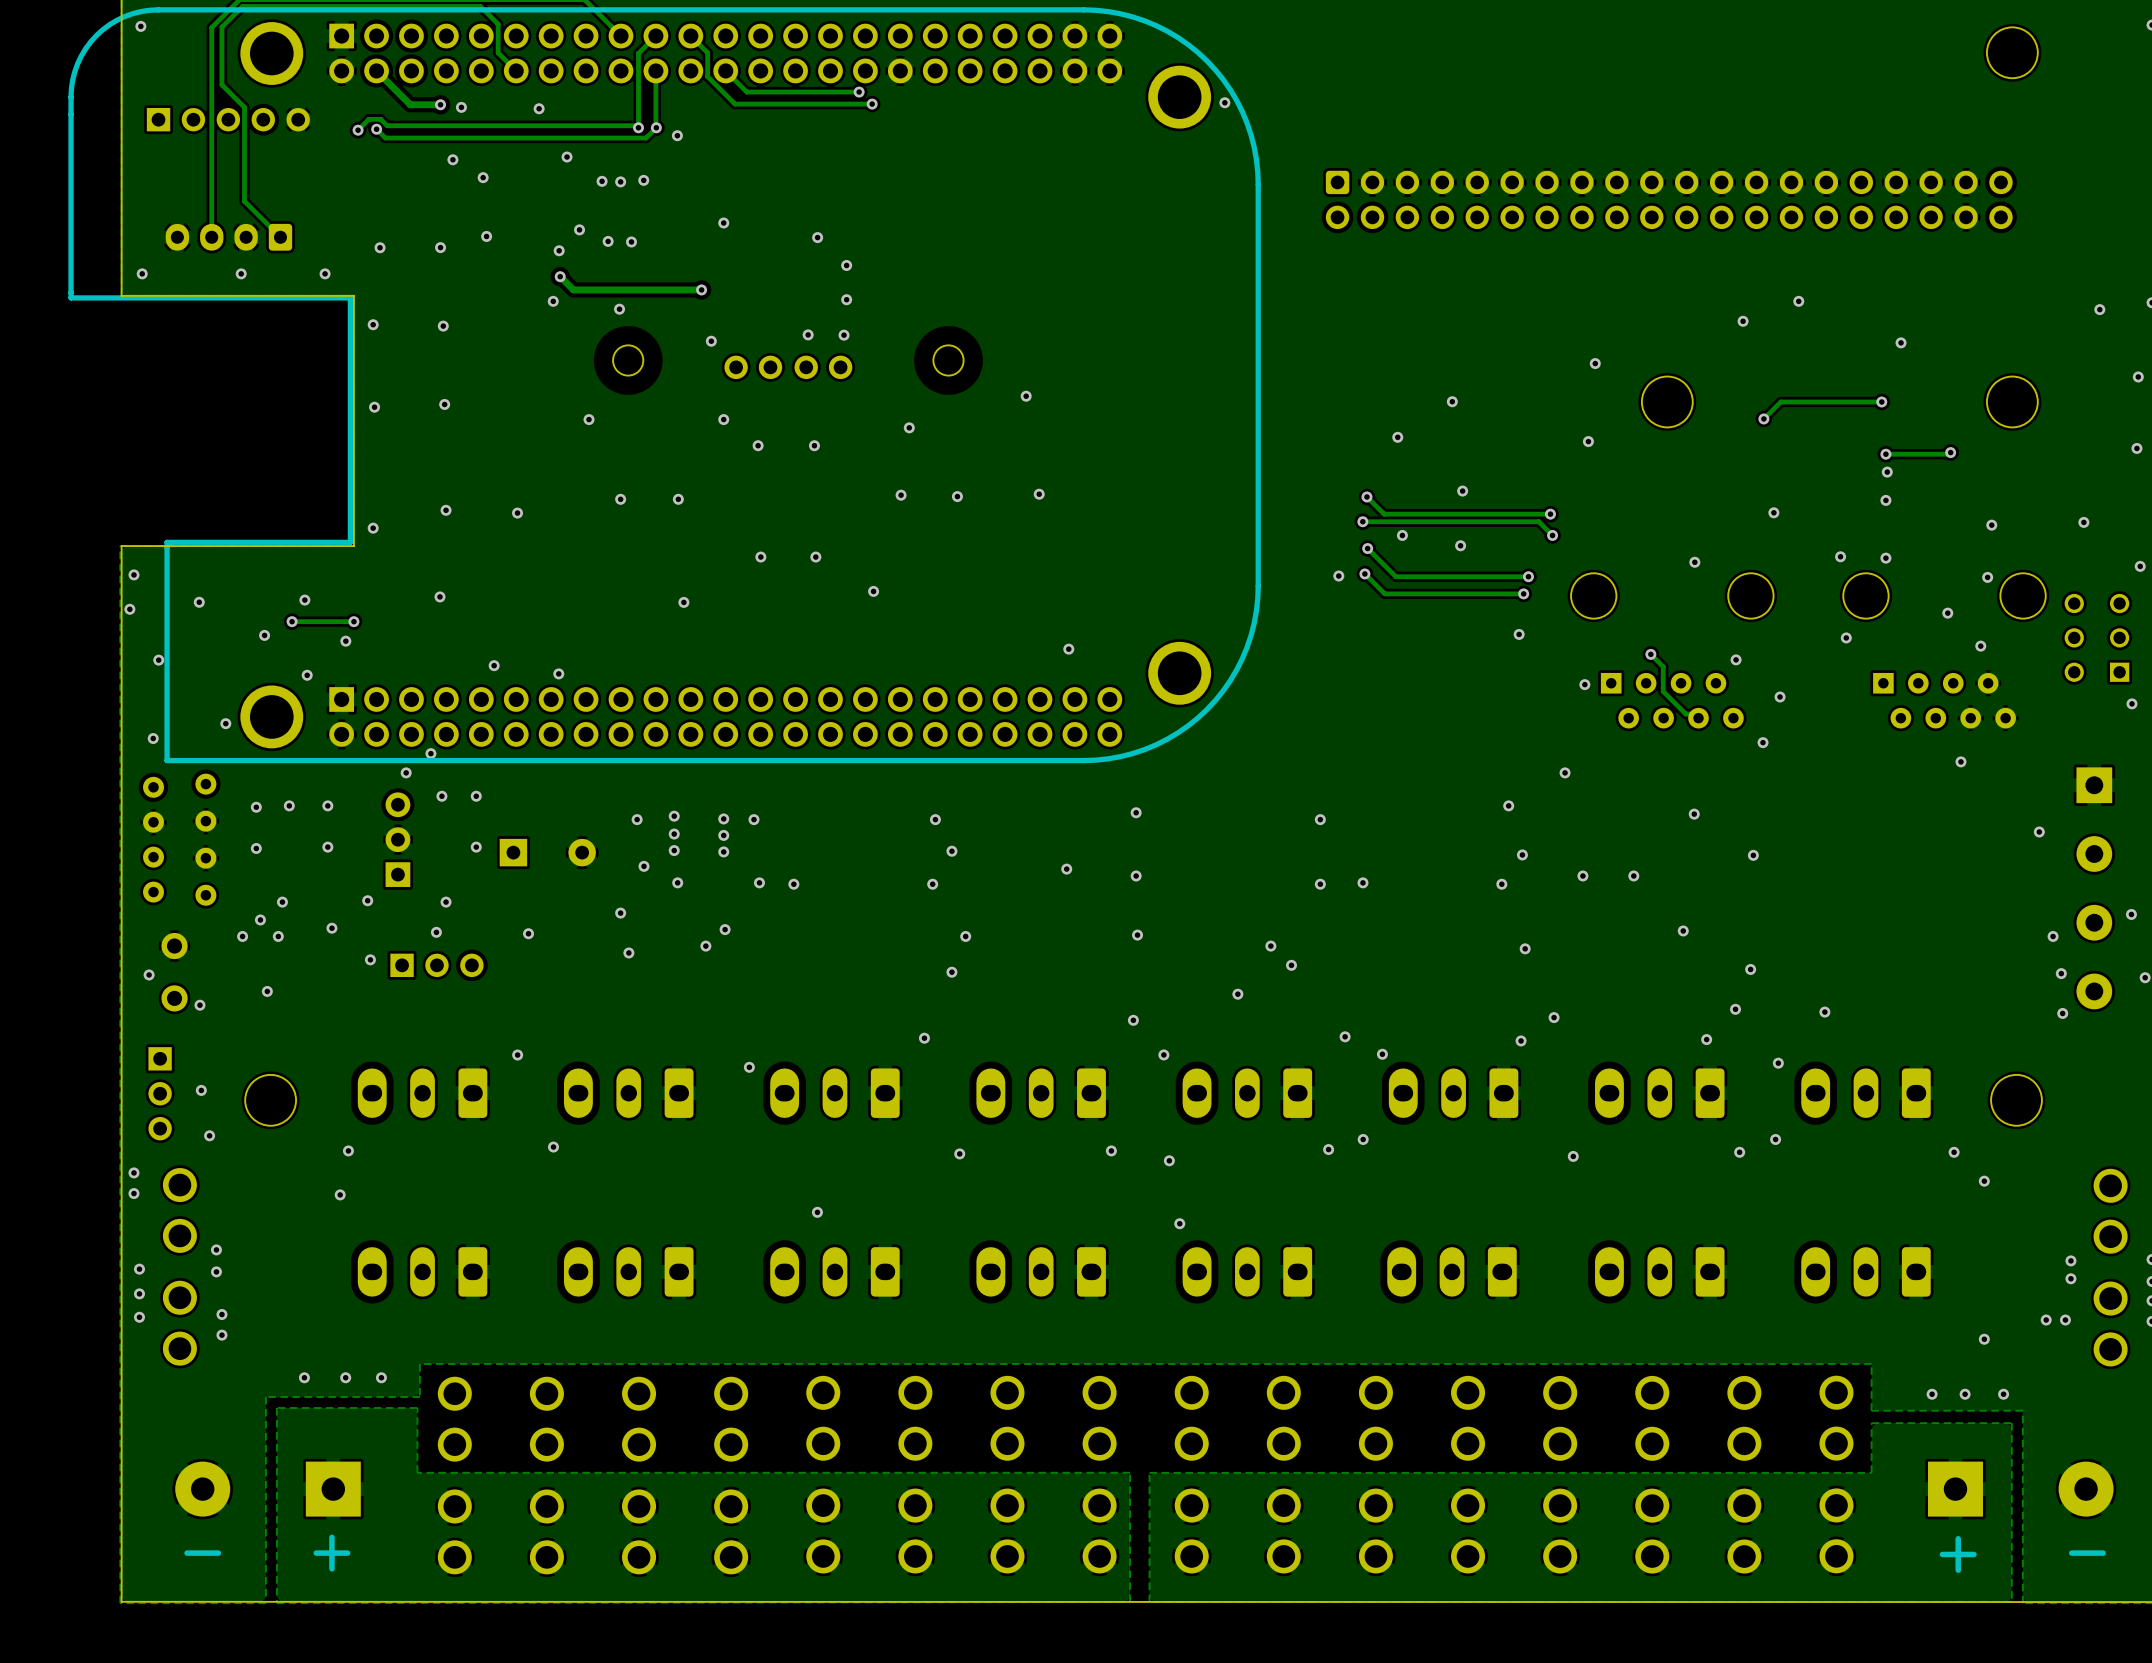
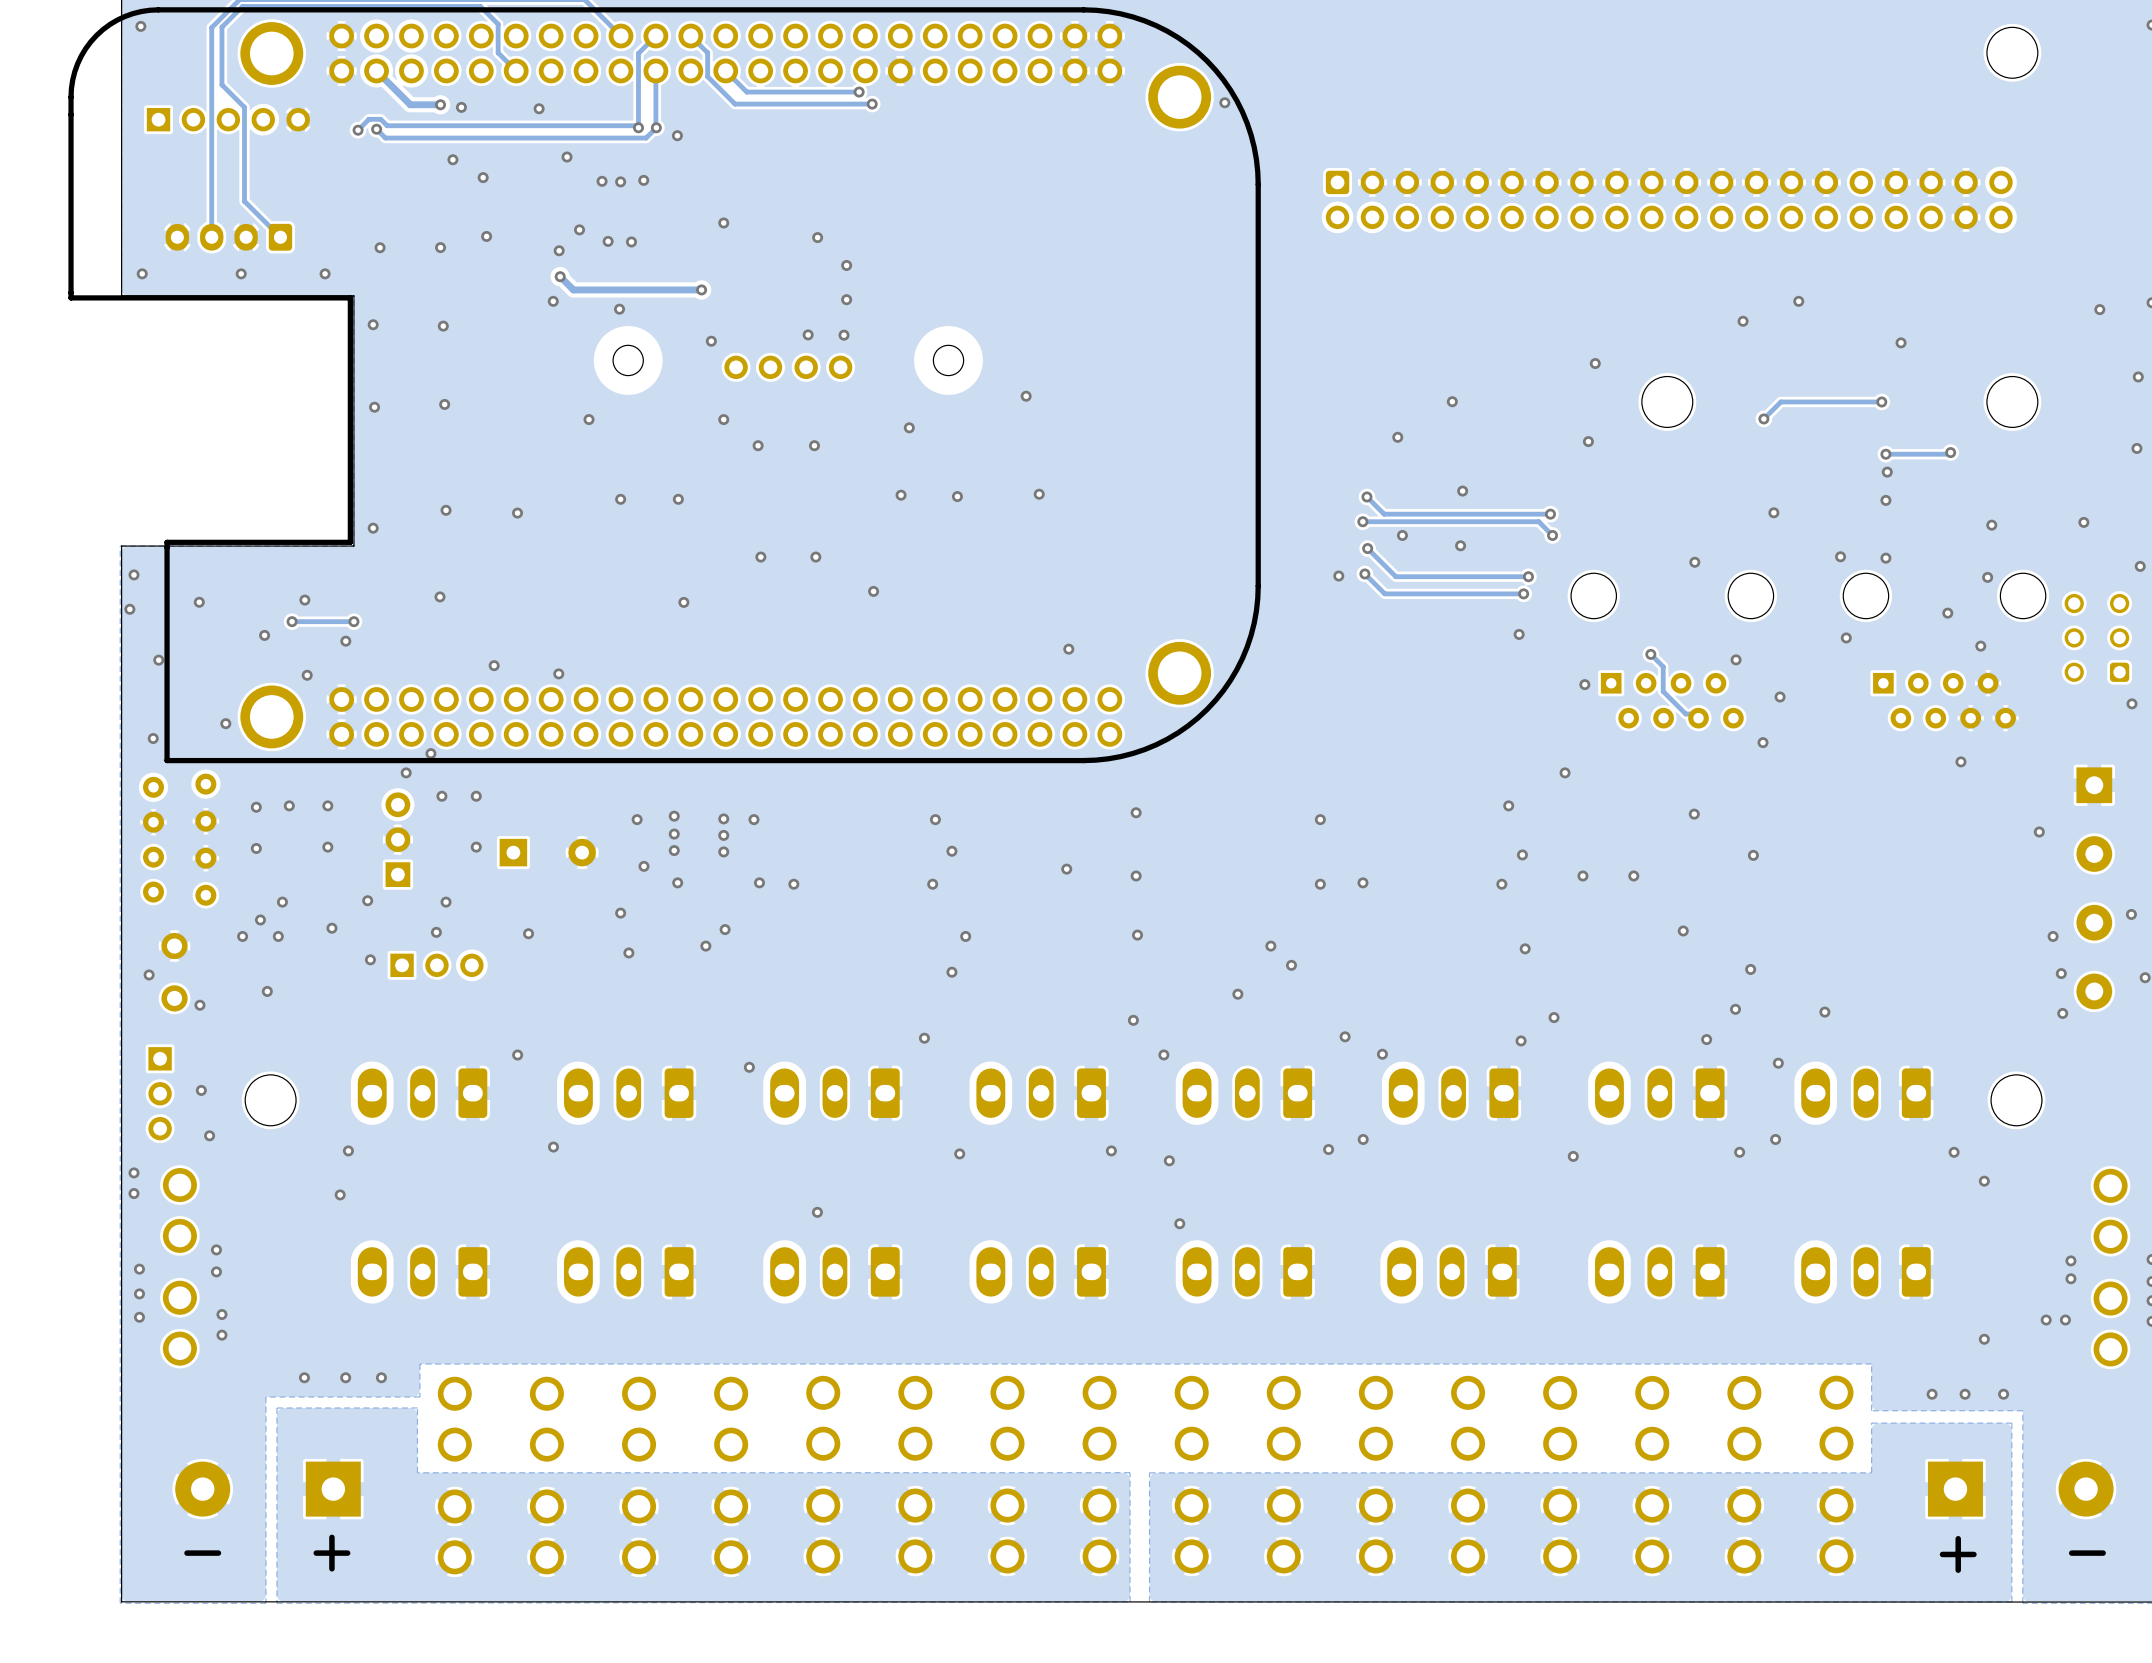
part footprint: [68, 7, 1261, 764] -> [68, 7, 1261, 764]
part footprint: [2064, 593, 2130, 682] -> [2064, 593, 2130, 682]

